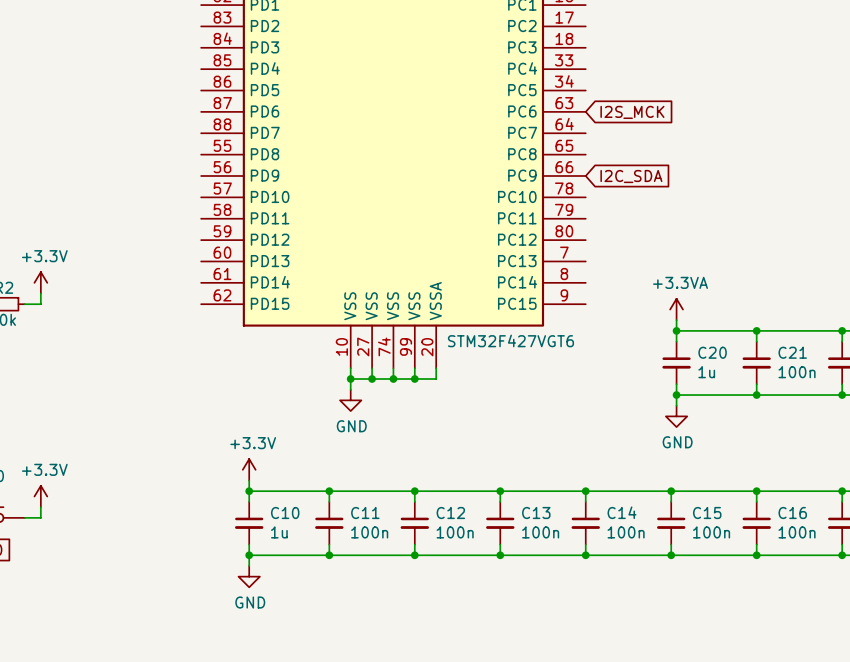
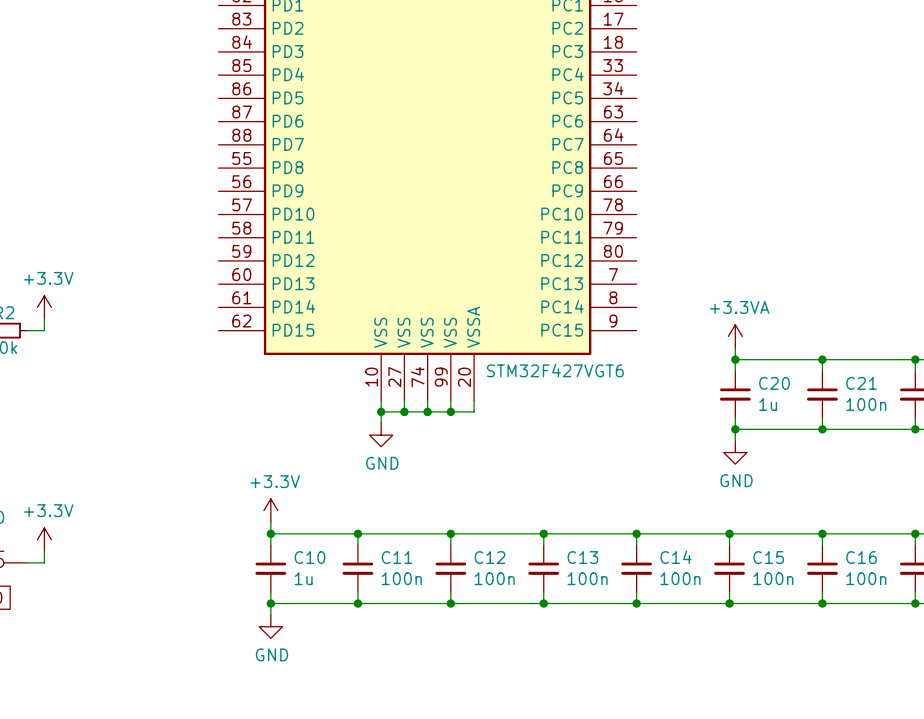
global label: I2S_MCK (632, 112) -> none
global label: I2C_SDA (631, 176) -> none

